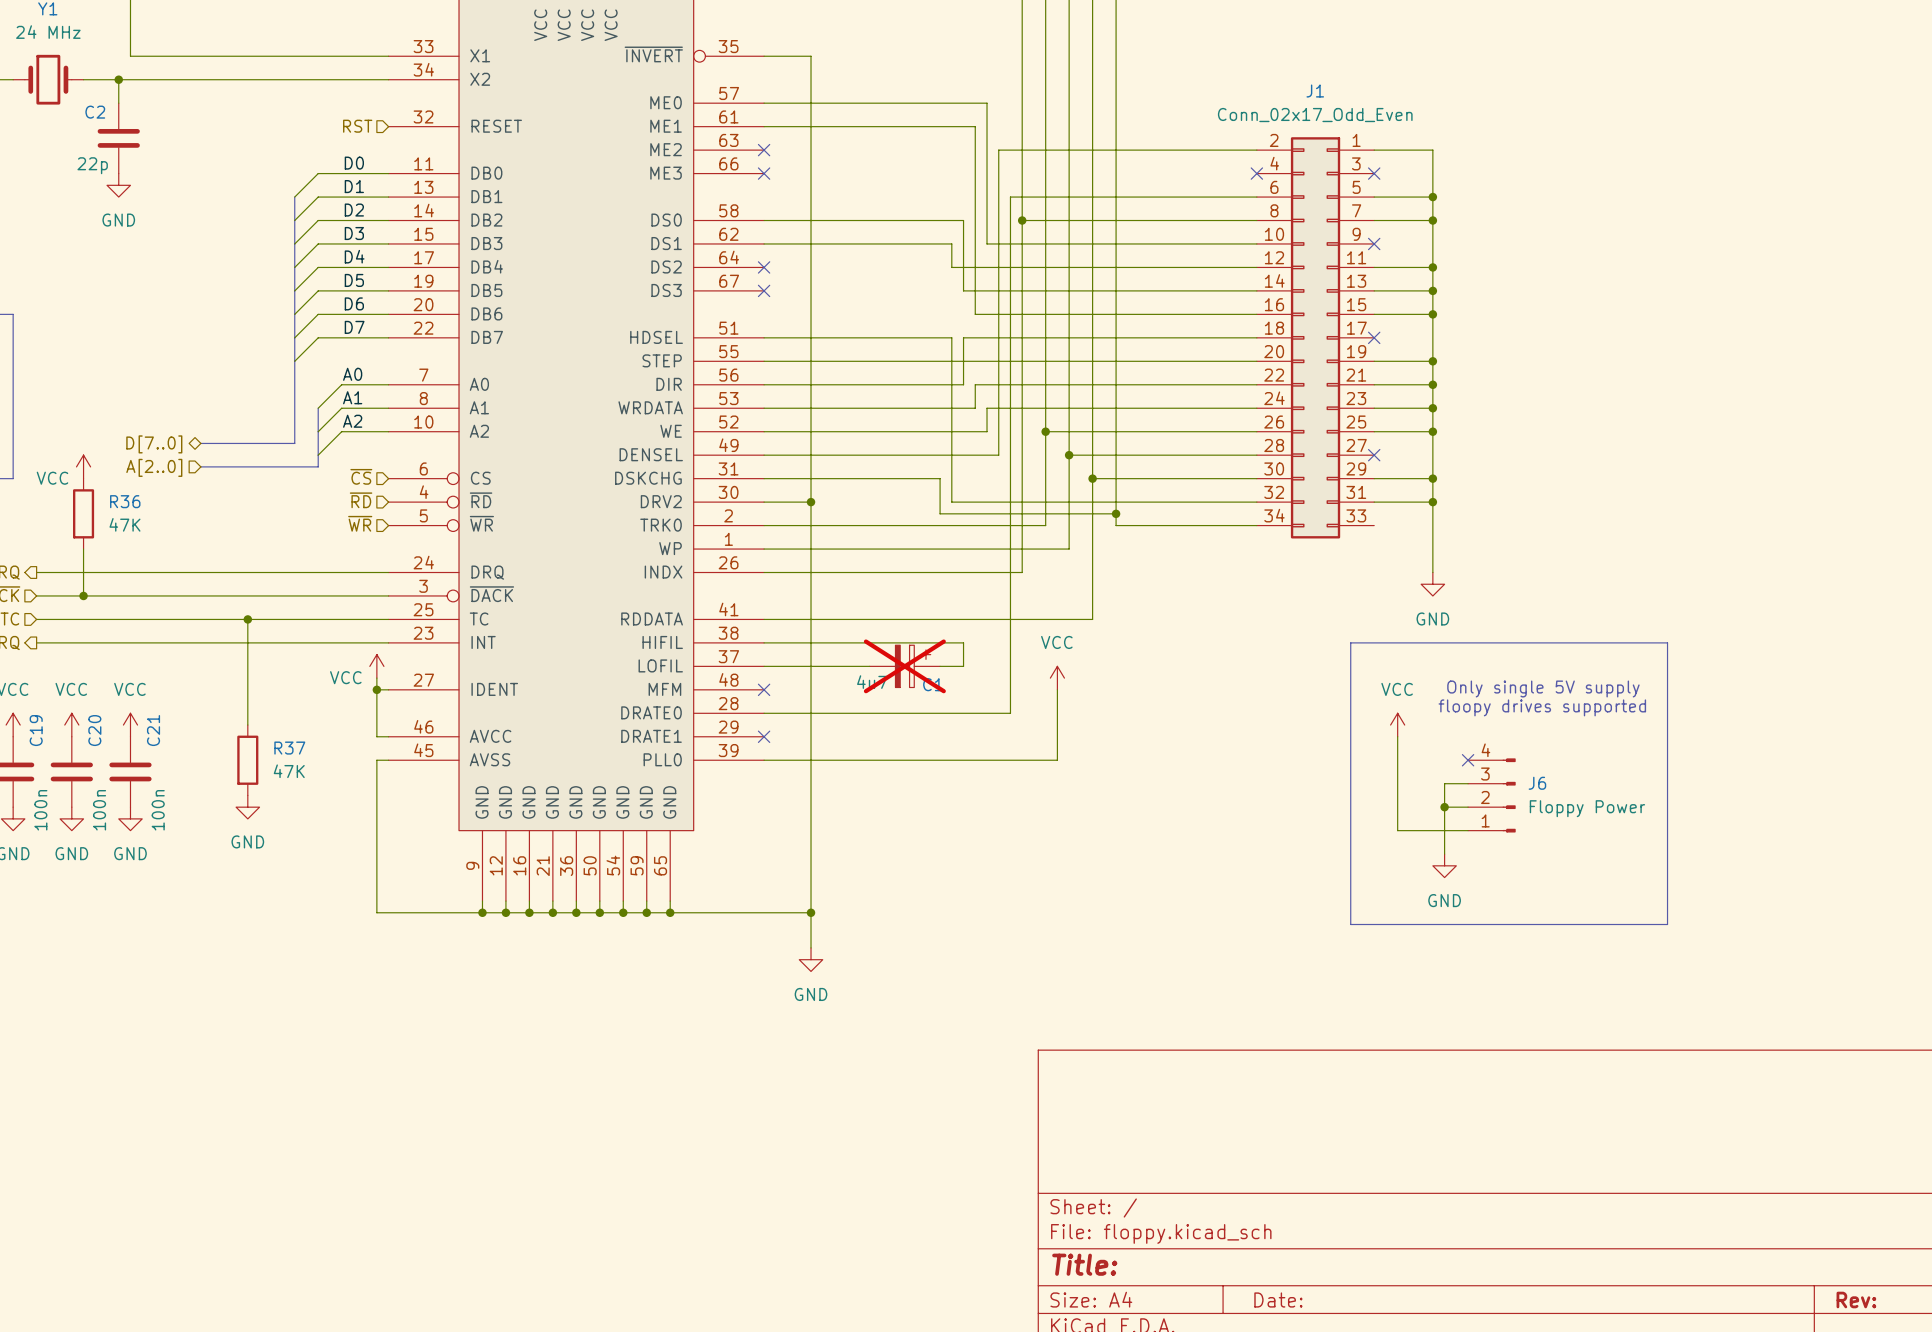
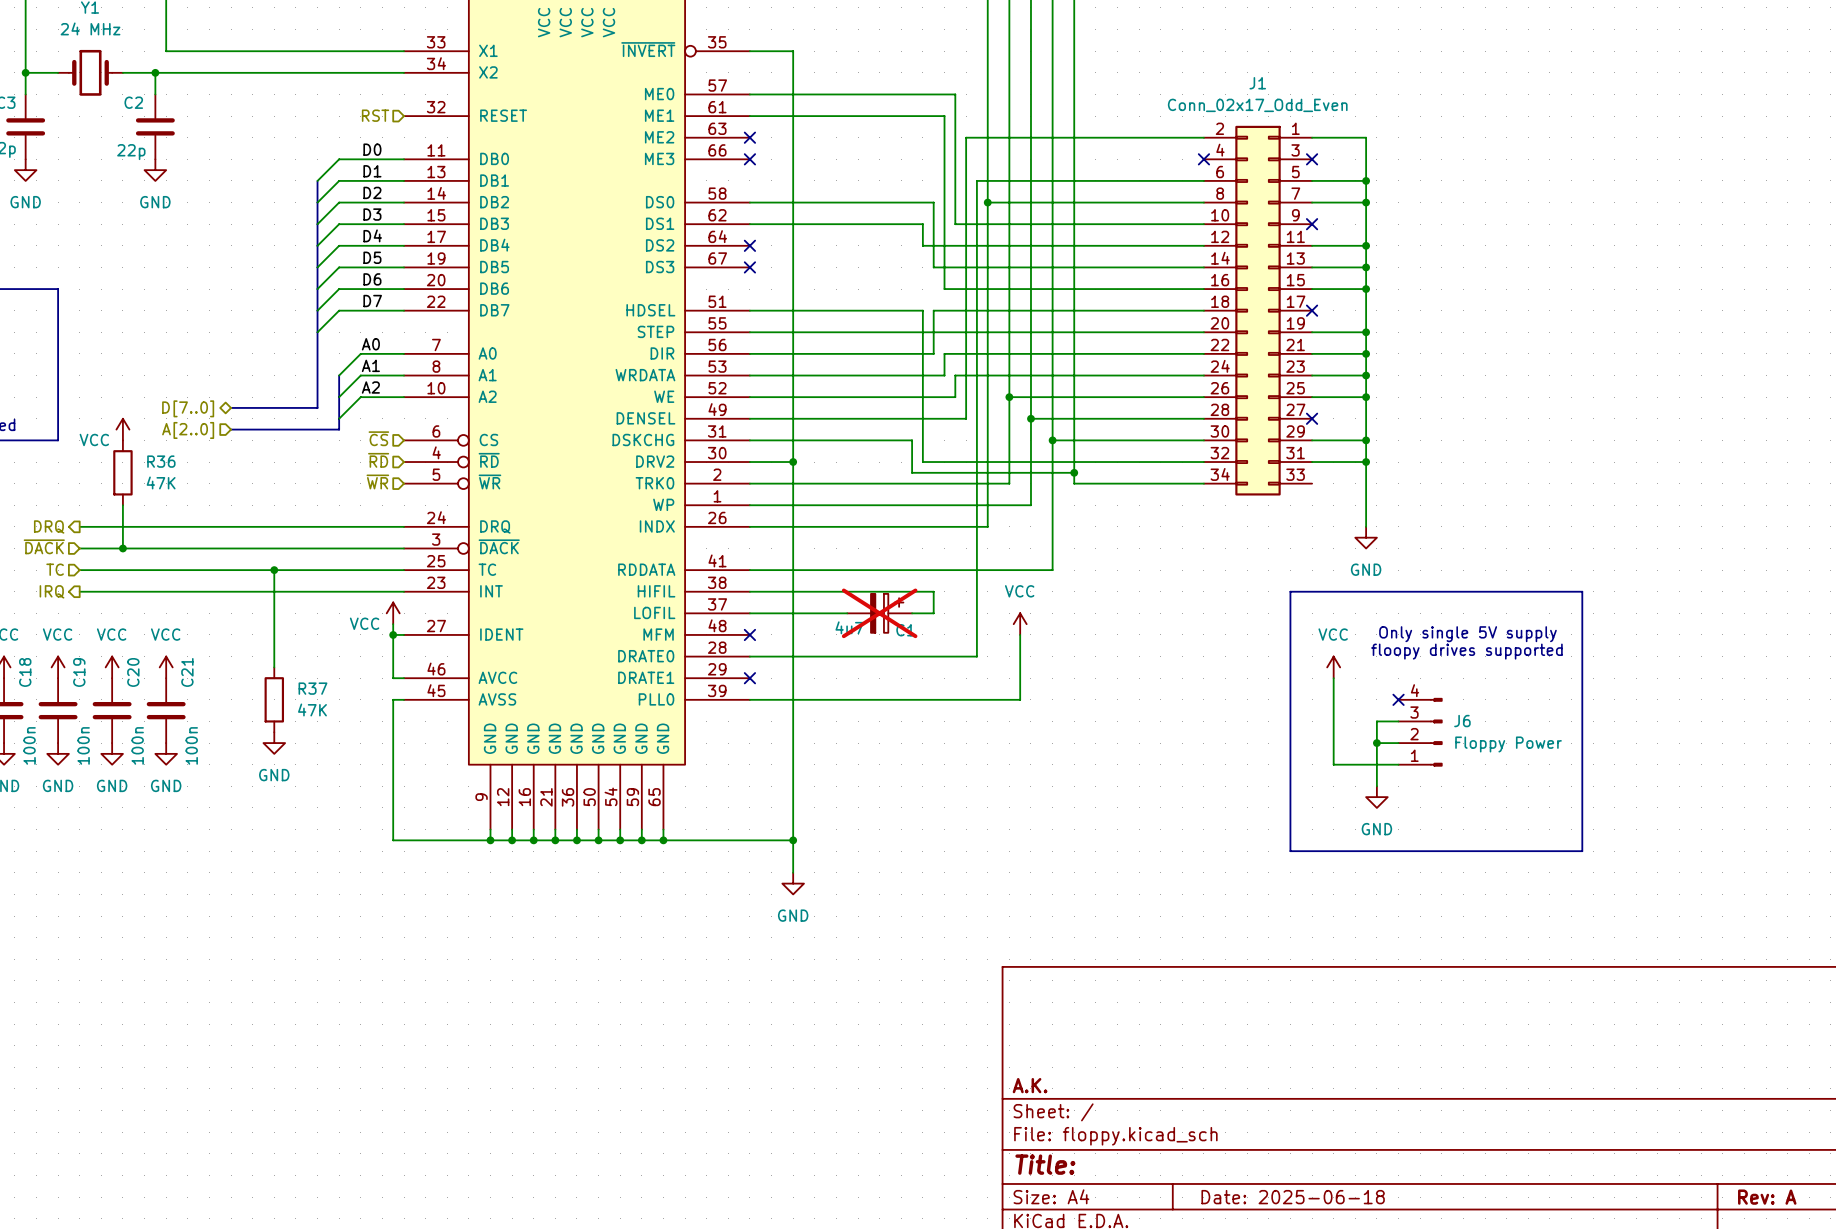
title block: none -> A.K. (1030, 1085)
title block: Date: (1278, 1300) -> Date: 2025-06-18 (1293, 1197)
title block: Rev: (1856, 1300) -> Rev: A (1767, 1197)

